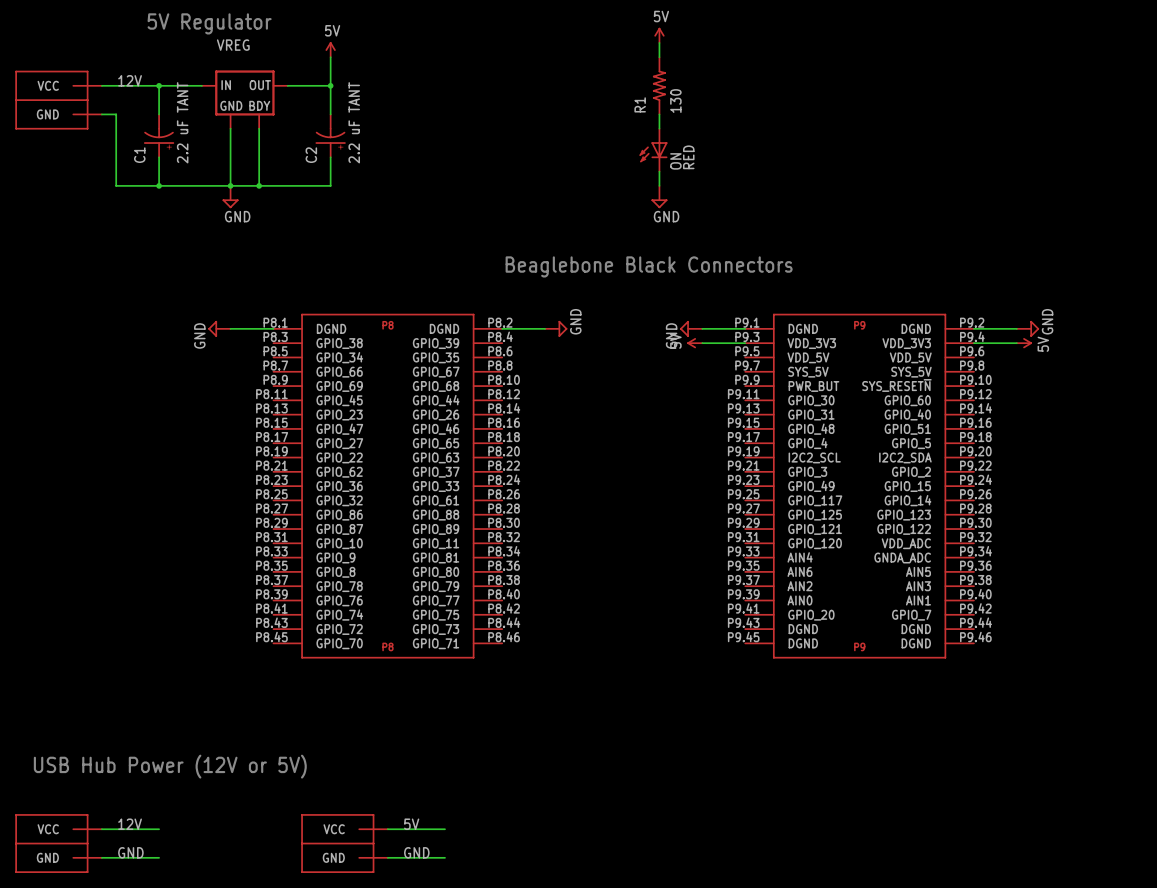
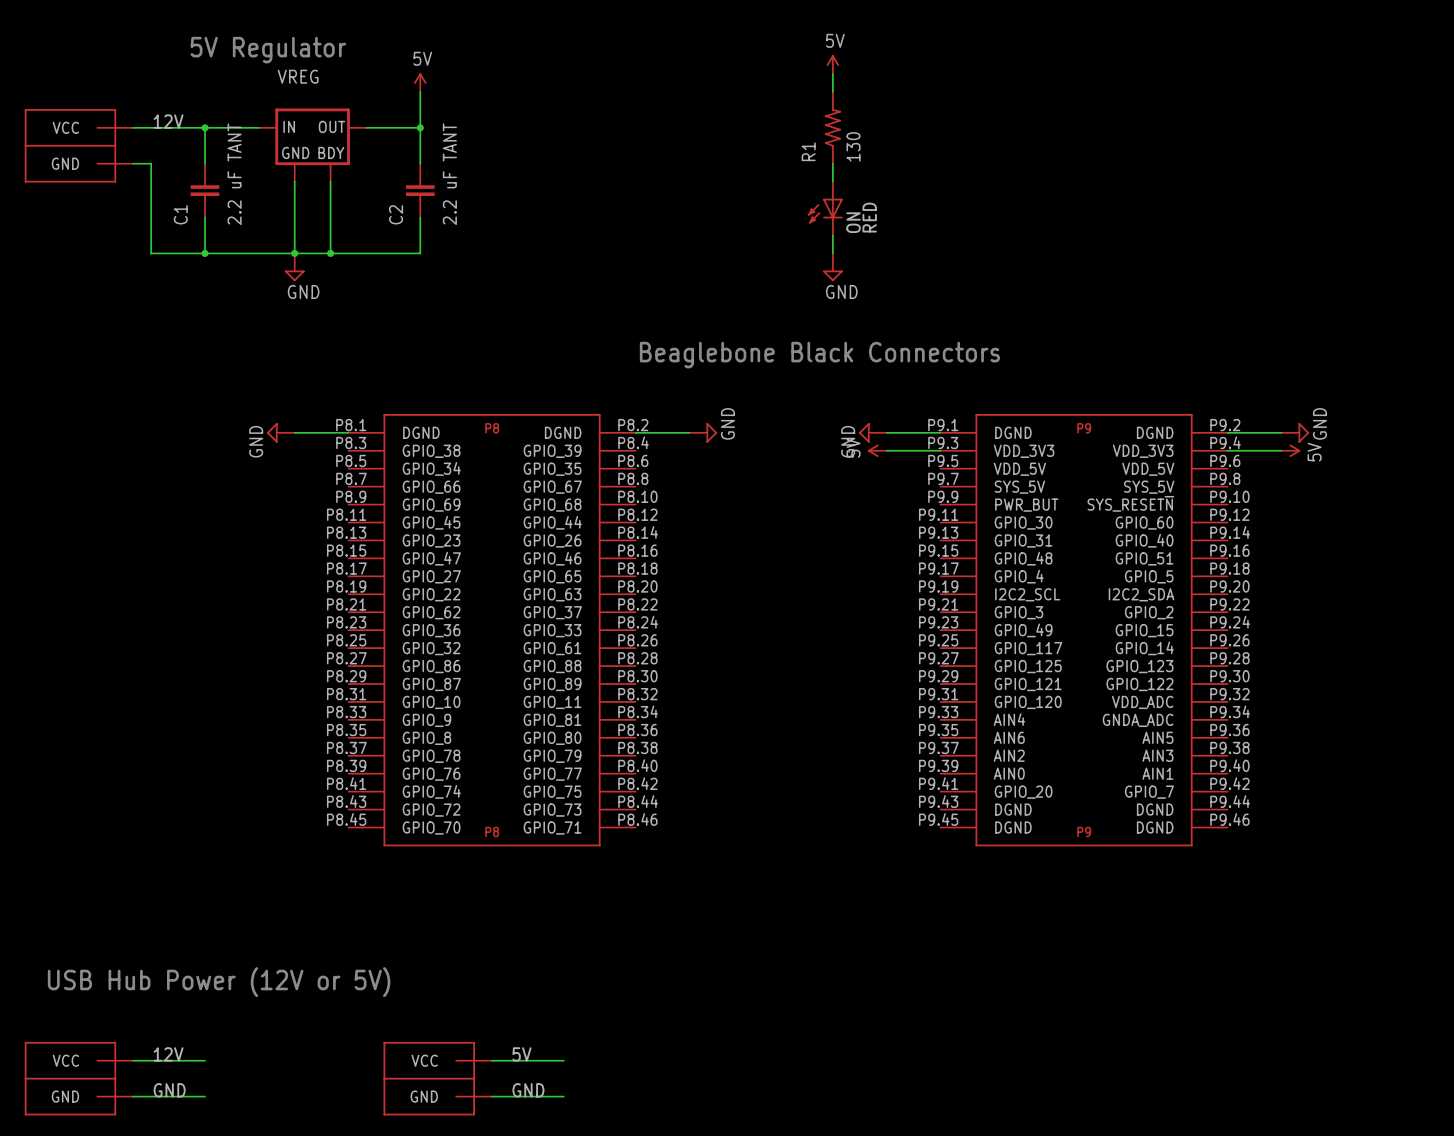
C1 symbol: [144, 114, 175, 158] -> [190, 163, 220, 218]
C2 symbol: [315, 114, 346, 158] -> [405, 163, 435, 218]

